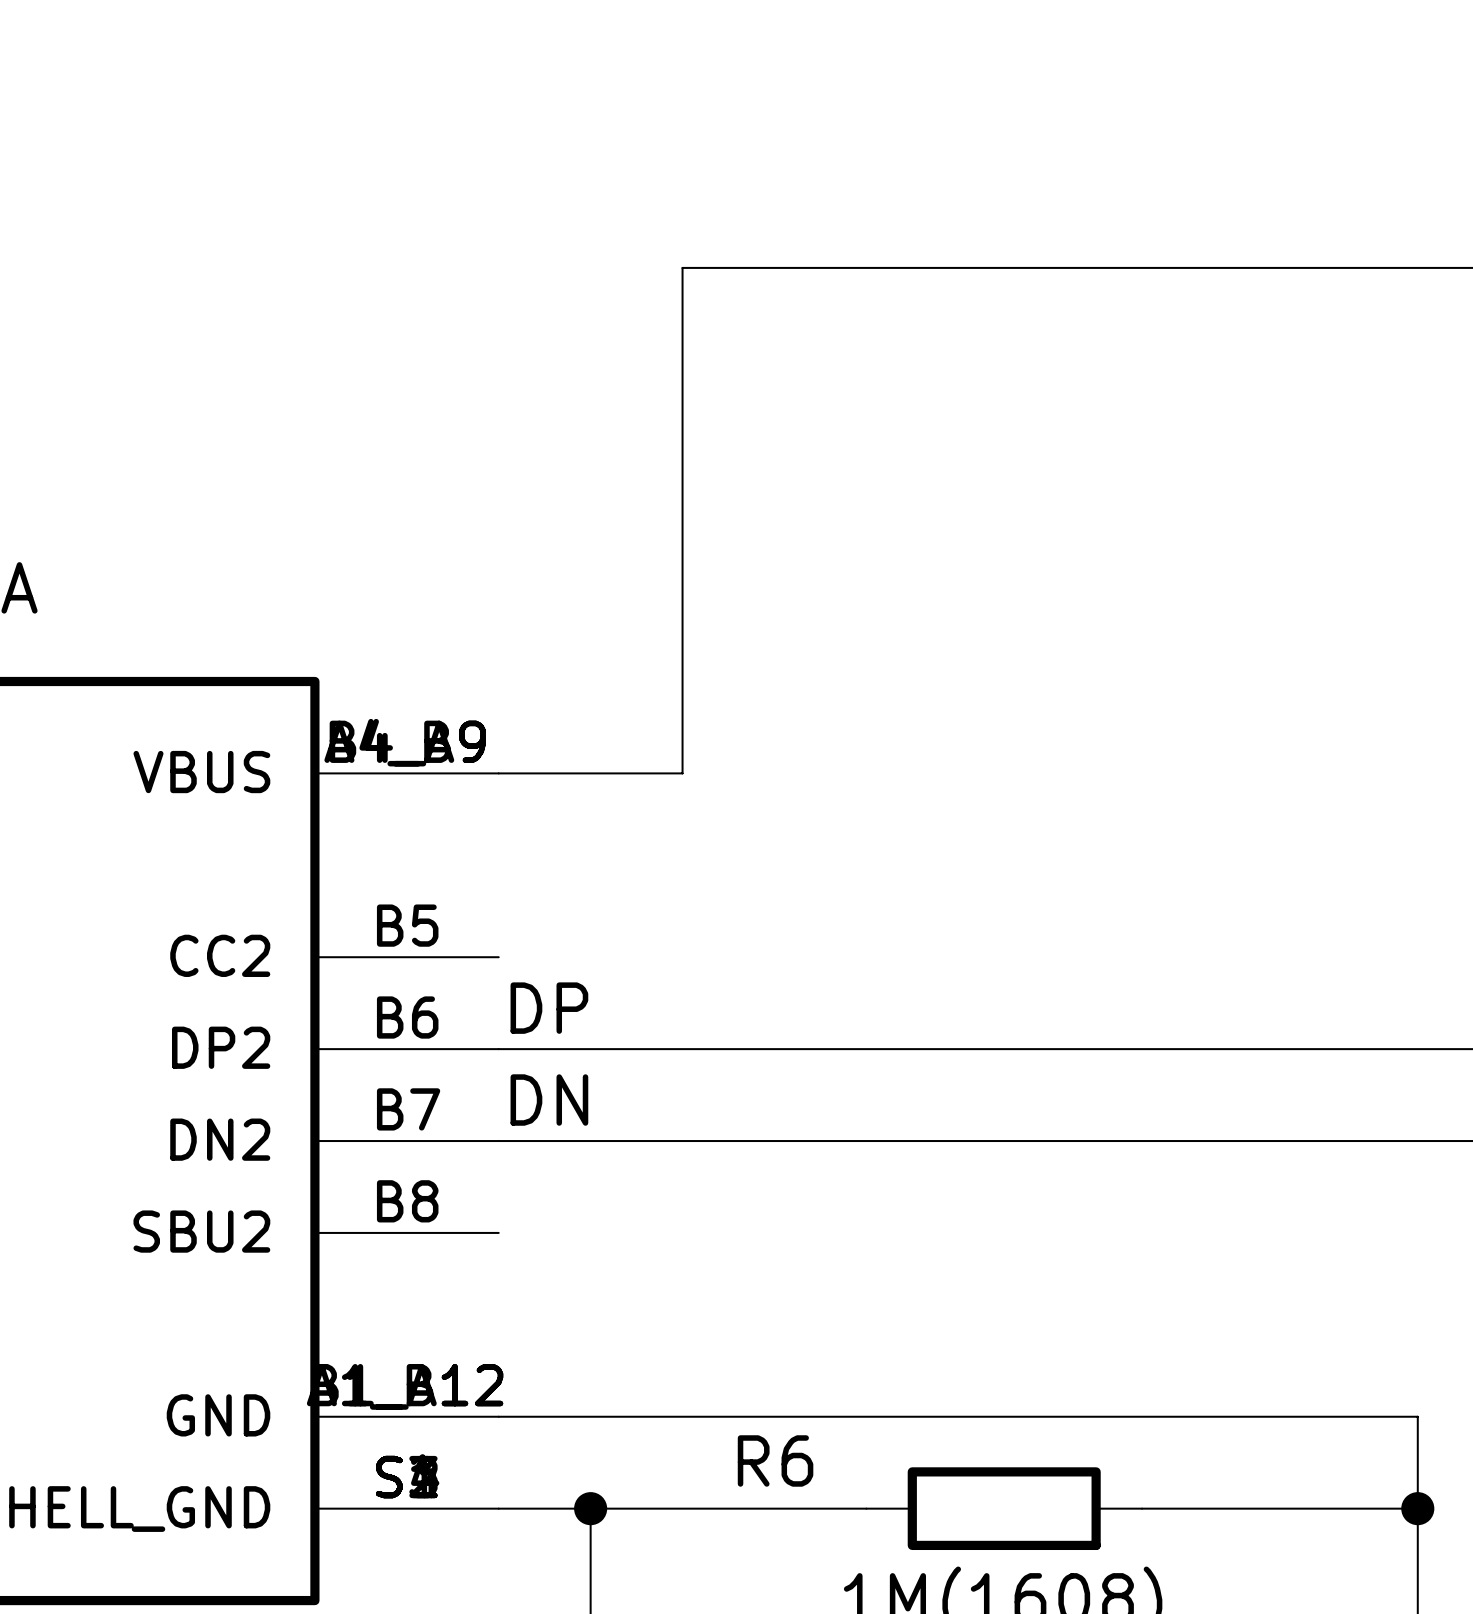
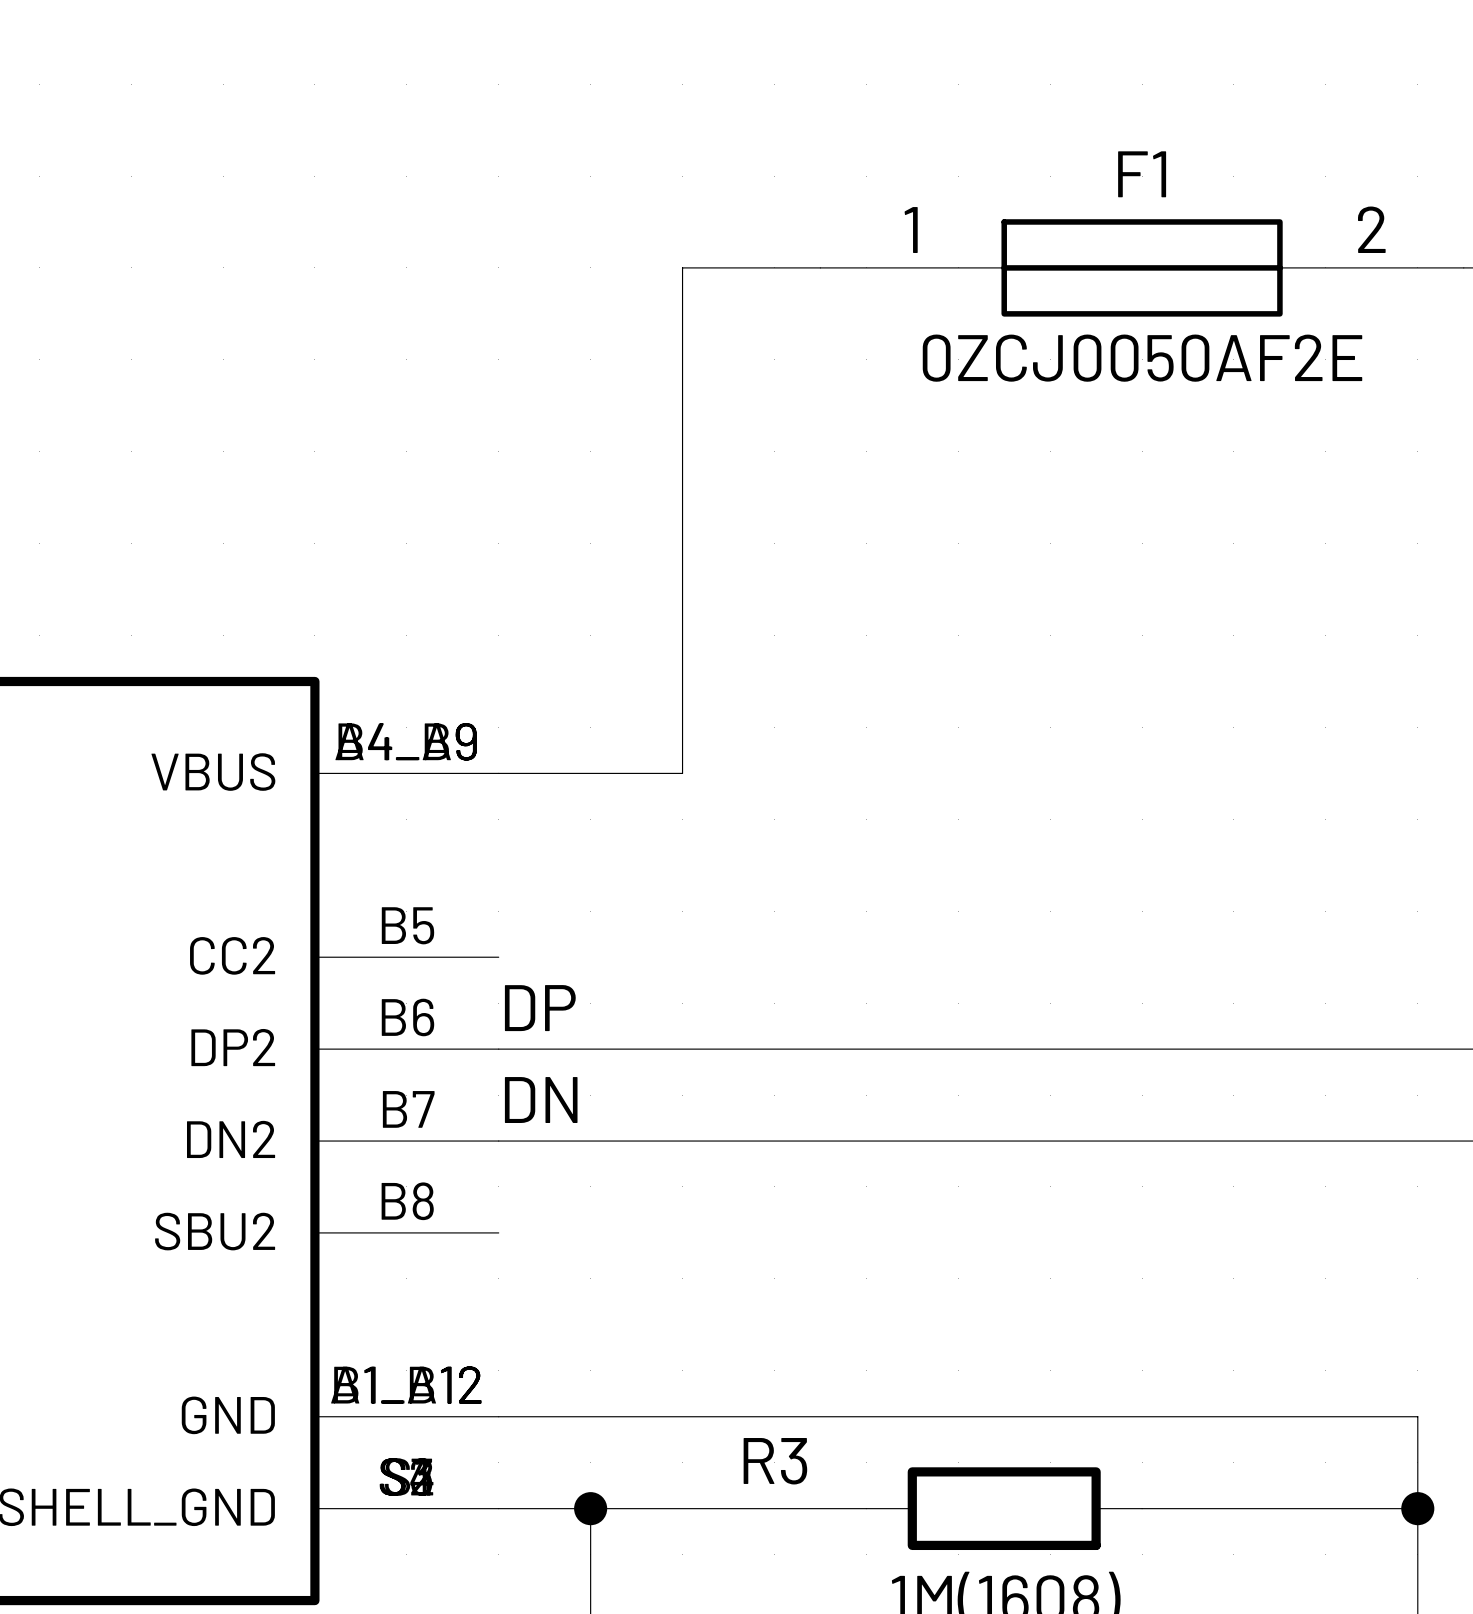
F1: none -> 0ZCJ0050AF2E (1142, 267)
R6 name: R6 (775, 1460) -> R3 (775, 1461)

